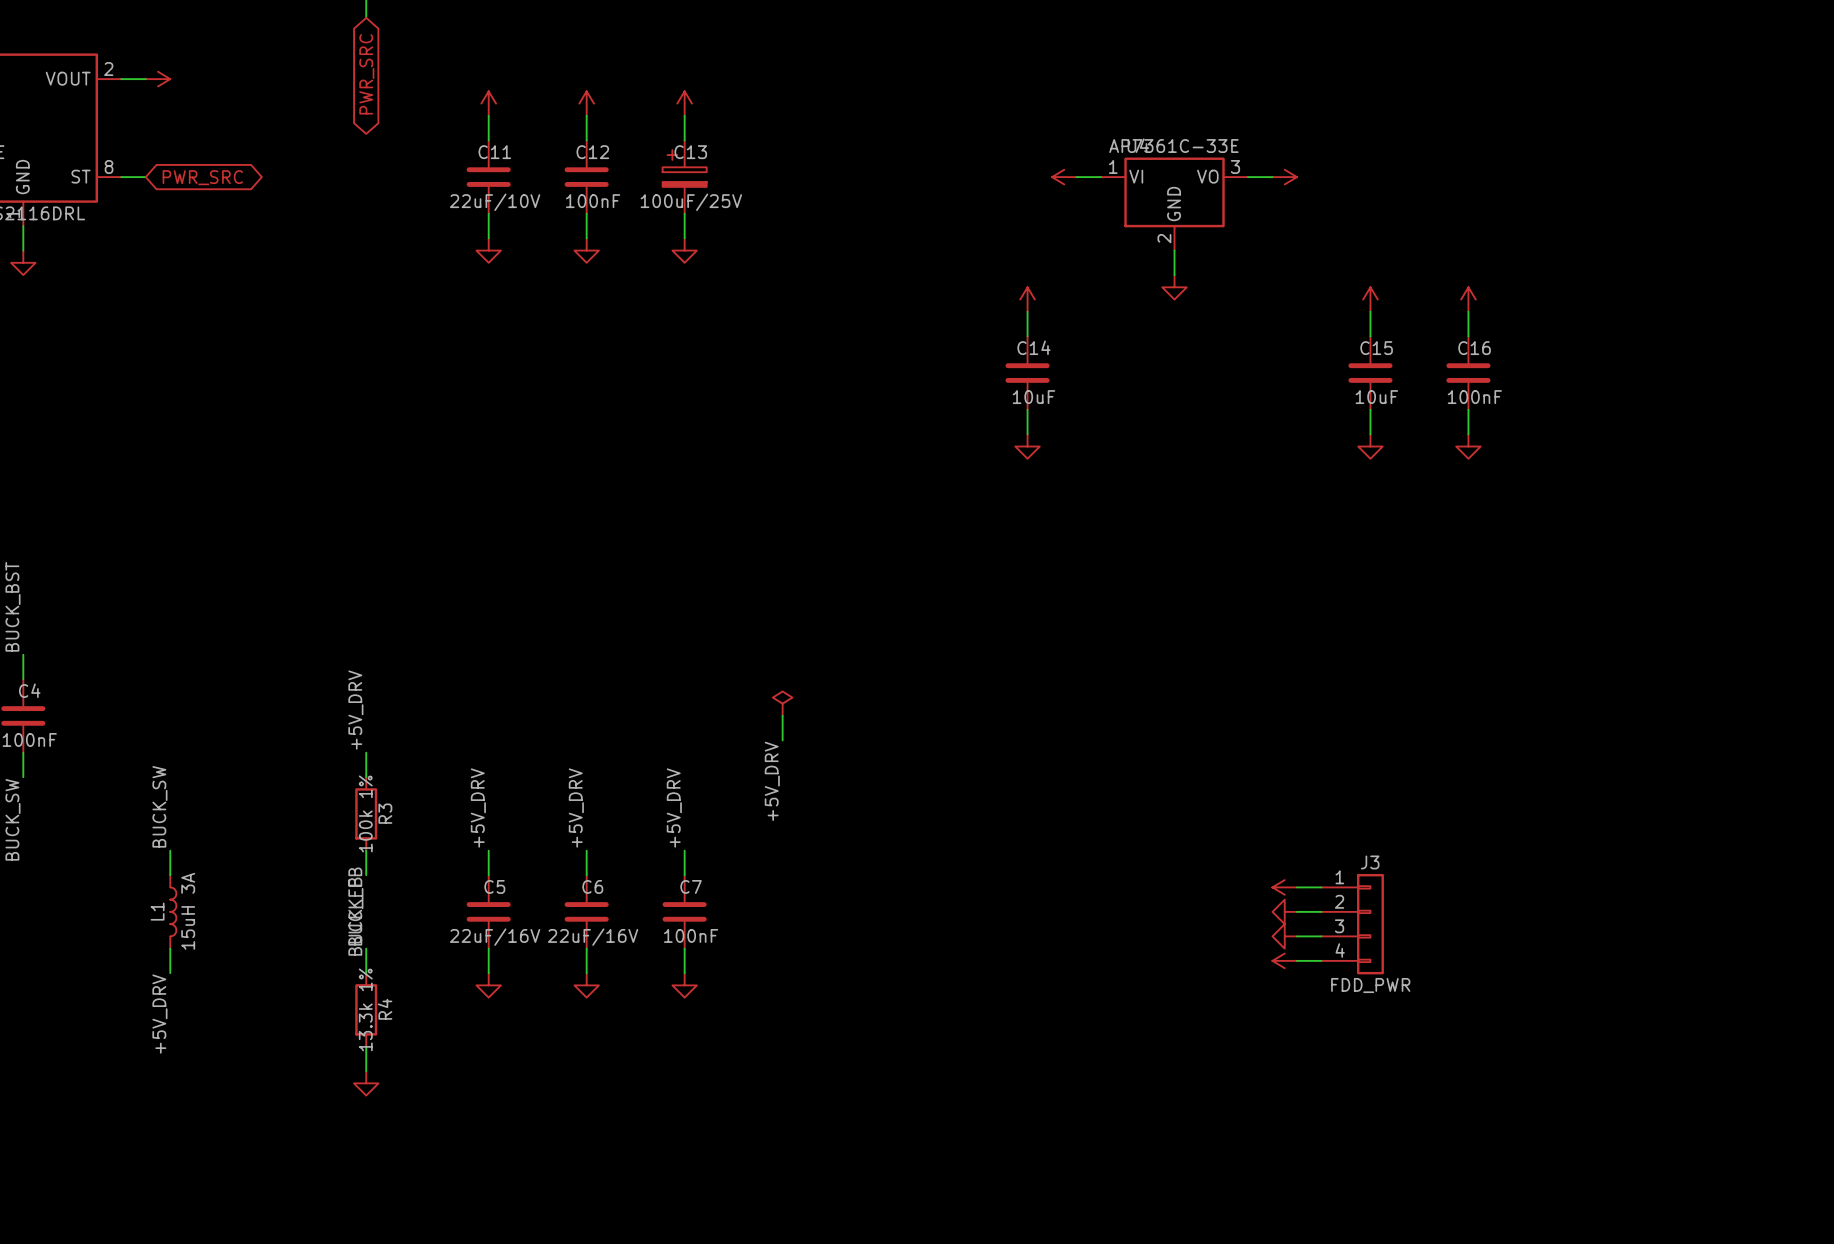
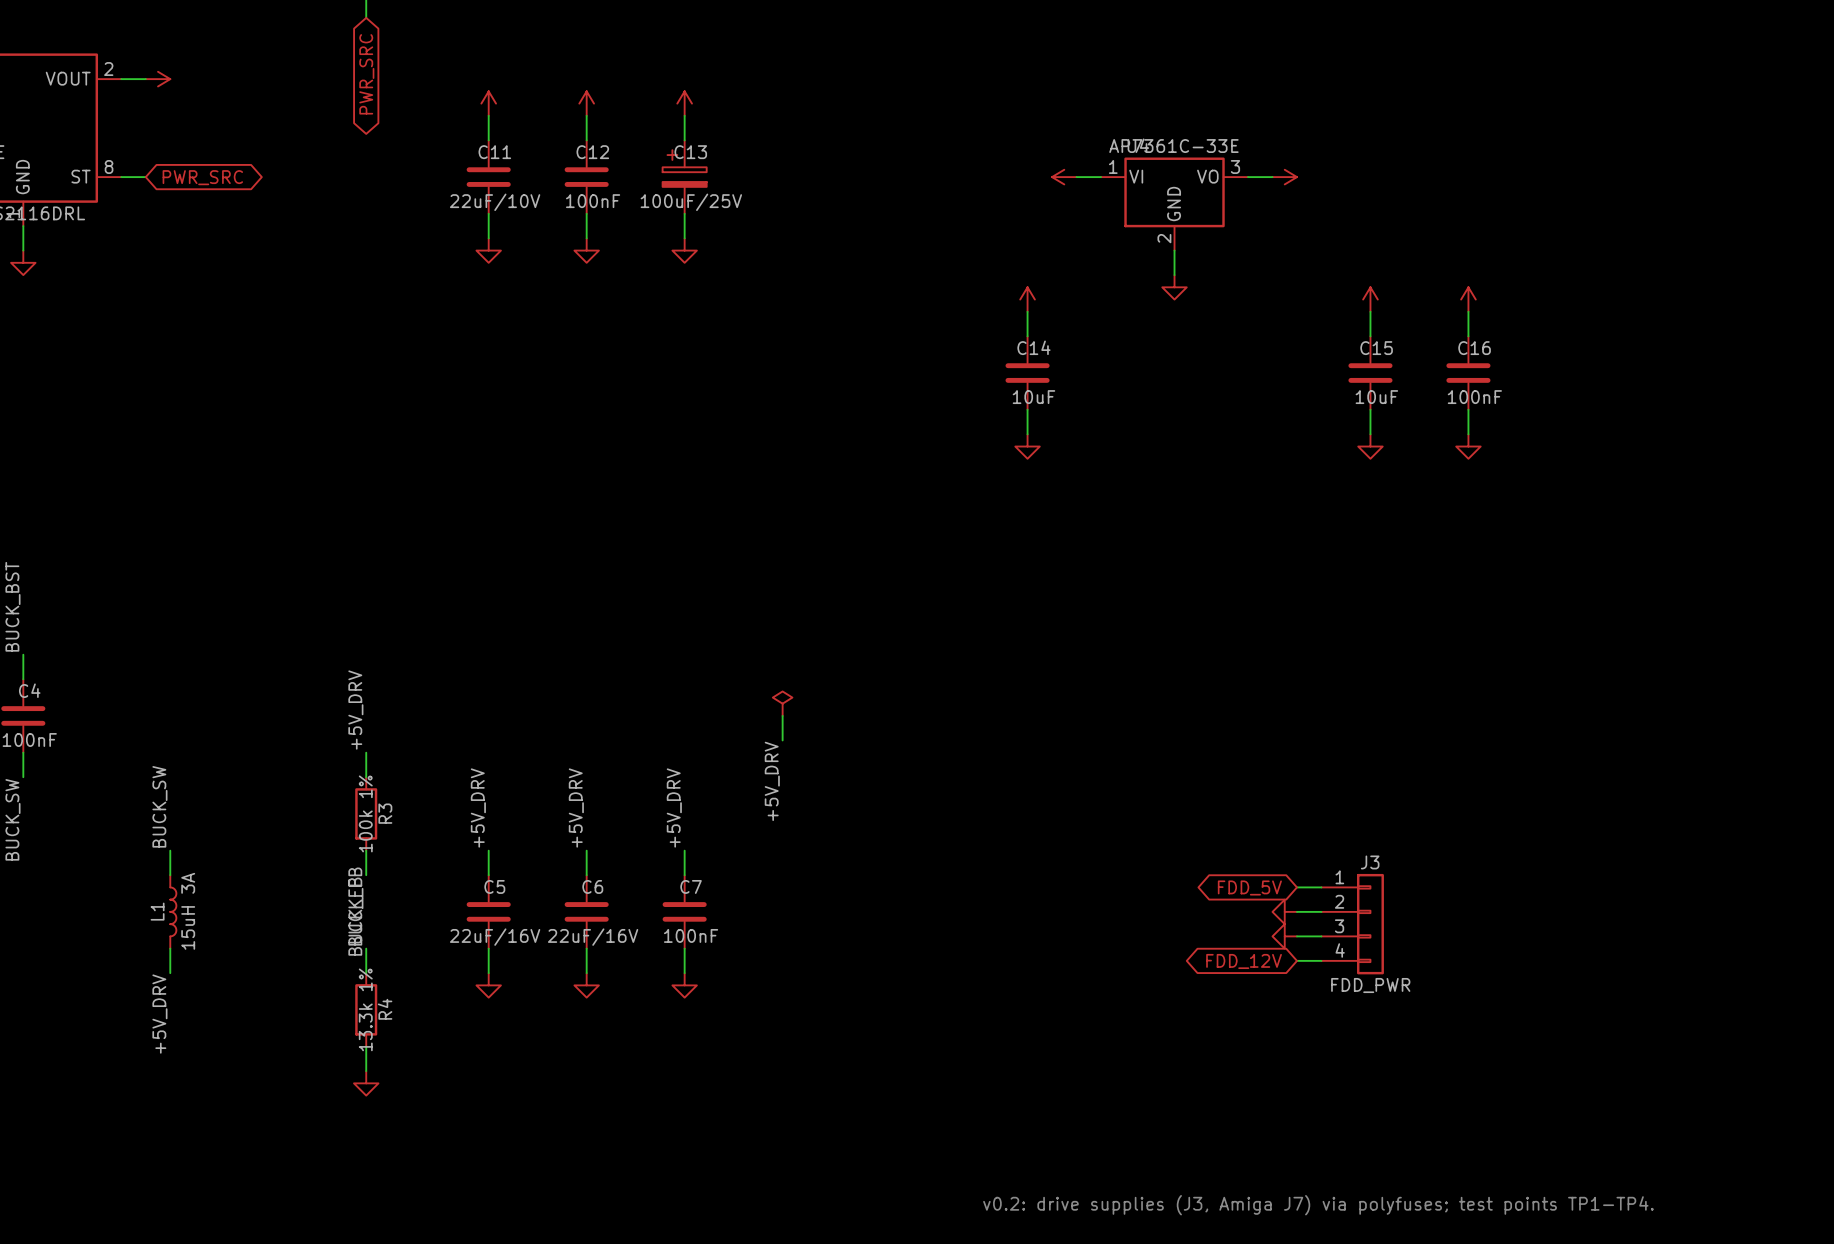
global label: none -> FDD_5V (1249, 887)
power symbol: (1284, 887) -> none
power symbol: (1284, 960) -> none
global label: none -> FDD_12V (1244, 961)
text: none -> v0.2: drive supplies (J3, Amiga J7) via polyfuses; test points TP1-TP4. (1318, 1205)

